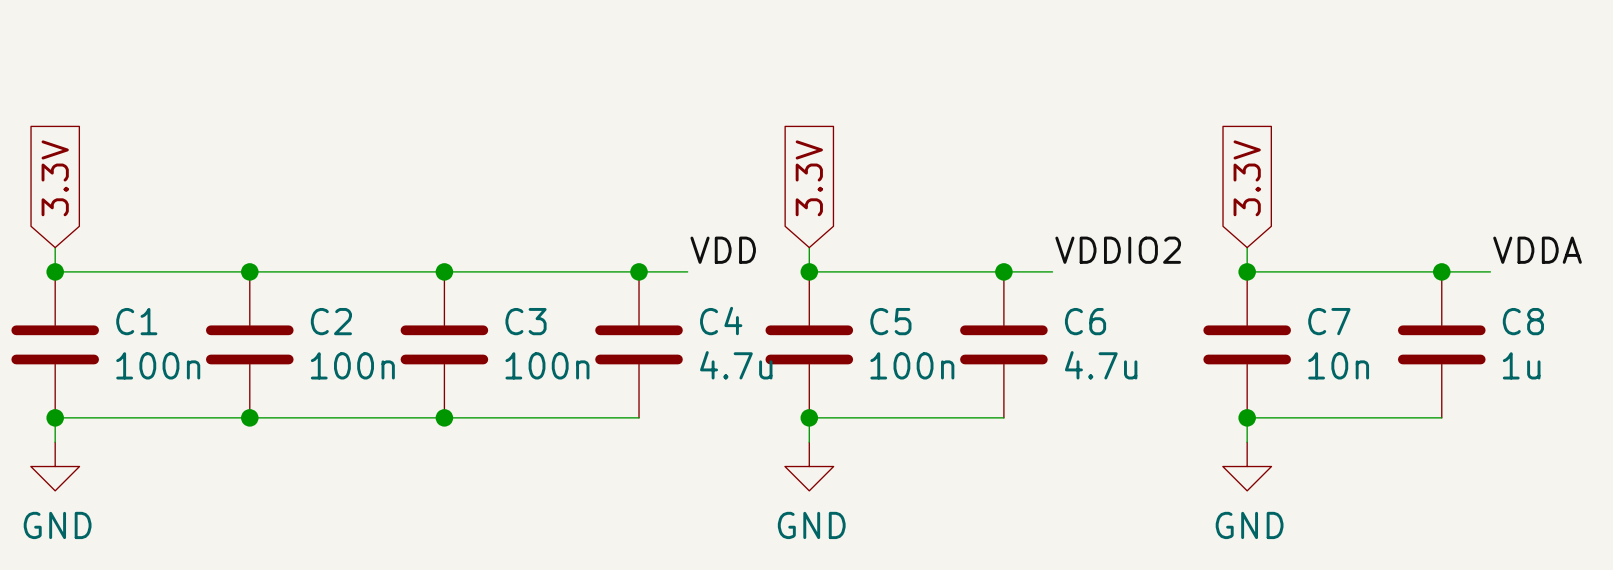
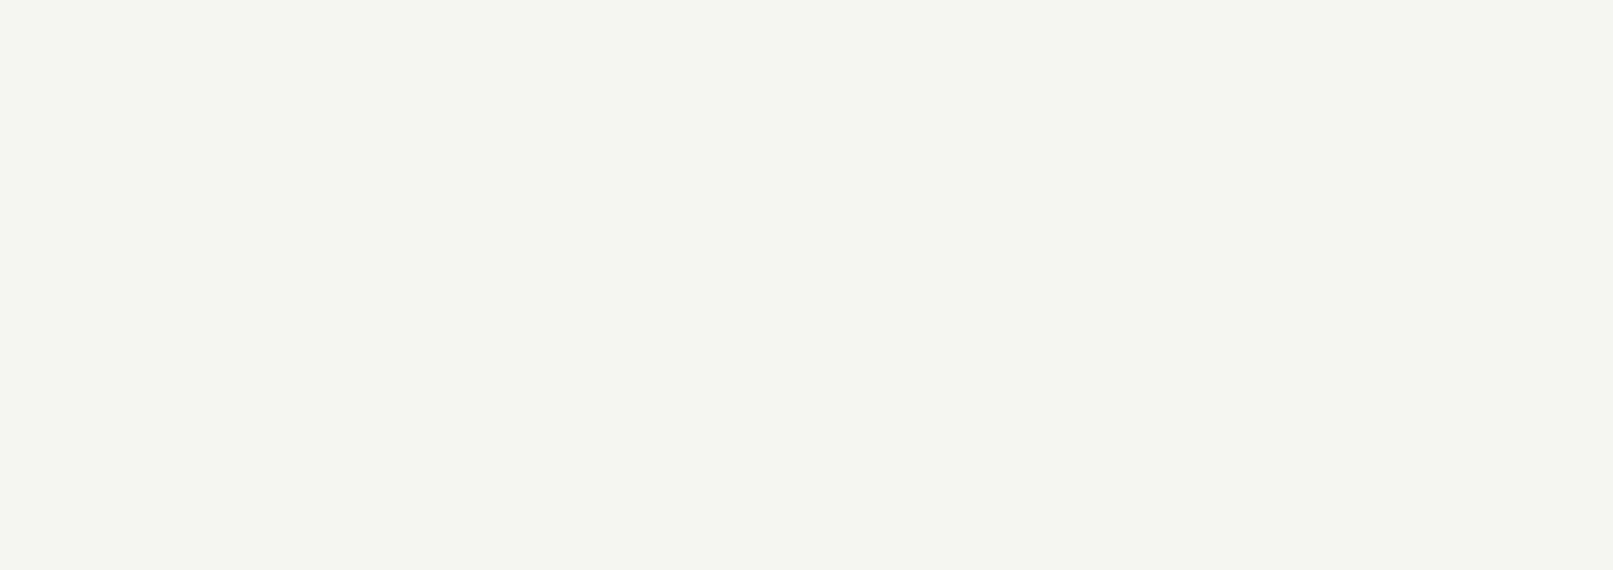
global label: 3.3V (55, 178) -> none
global label: 3.3V (809, 178) -> none
global label: 3.3V (1247, 178) -> none
wire: (55, 247) (55, 271) (687, 271) -> none
wire: (809, 247) (809, 271) (1052, 271) -> none
wire: (1247, 247) (1247, 271) (1490, 271) -> none
label: VDD (723, 250) -> none
label: VDDIO2 (1118, 250) -> none
label: VDDA (1537, 250) -> none
junction: (55, 271) -> none
junction: (249, 271) -> none
junction: (444, 271) -> none
junction: (639, 271) -> none
junction: (809, 271) -> none
junction: (1003, 271) -> none
junction: (1247, 271) -> none
junction: (1441, 271) -> none
C1: 100n (55, 344) -> none
C2: 100n (249, 344) -> none
C3: 100n (444, 344) -> none
C4: 4.7u (639, 344) -> none
C5: 100n (809, 344) -> none
C6: 4.7u (1003, 344) -> none
C7: 10n (1247, 344) -> none
C8: 1u (1441, 344) -> none
junction: (55, 417) -> none
junction: (249, 417) -> none
junction: (444, 417) -> none
wire: (639, 417) (55, 417) (55, 442) -> none
junction: (809, 417) -> none
wire: (1003, 417) (809, 417) (809, 442) -> none
junction: (1247, 417) -> none
wire: (1441, 417) (1247, 417) (1247, 442) -> none
power symbol: GND (55, 466) -> none
power symbol: GND (809, 466) -> none
power symbol: GND (1247, 466) -> none

